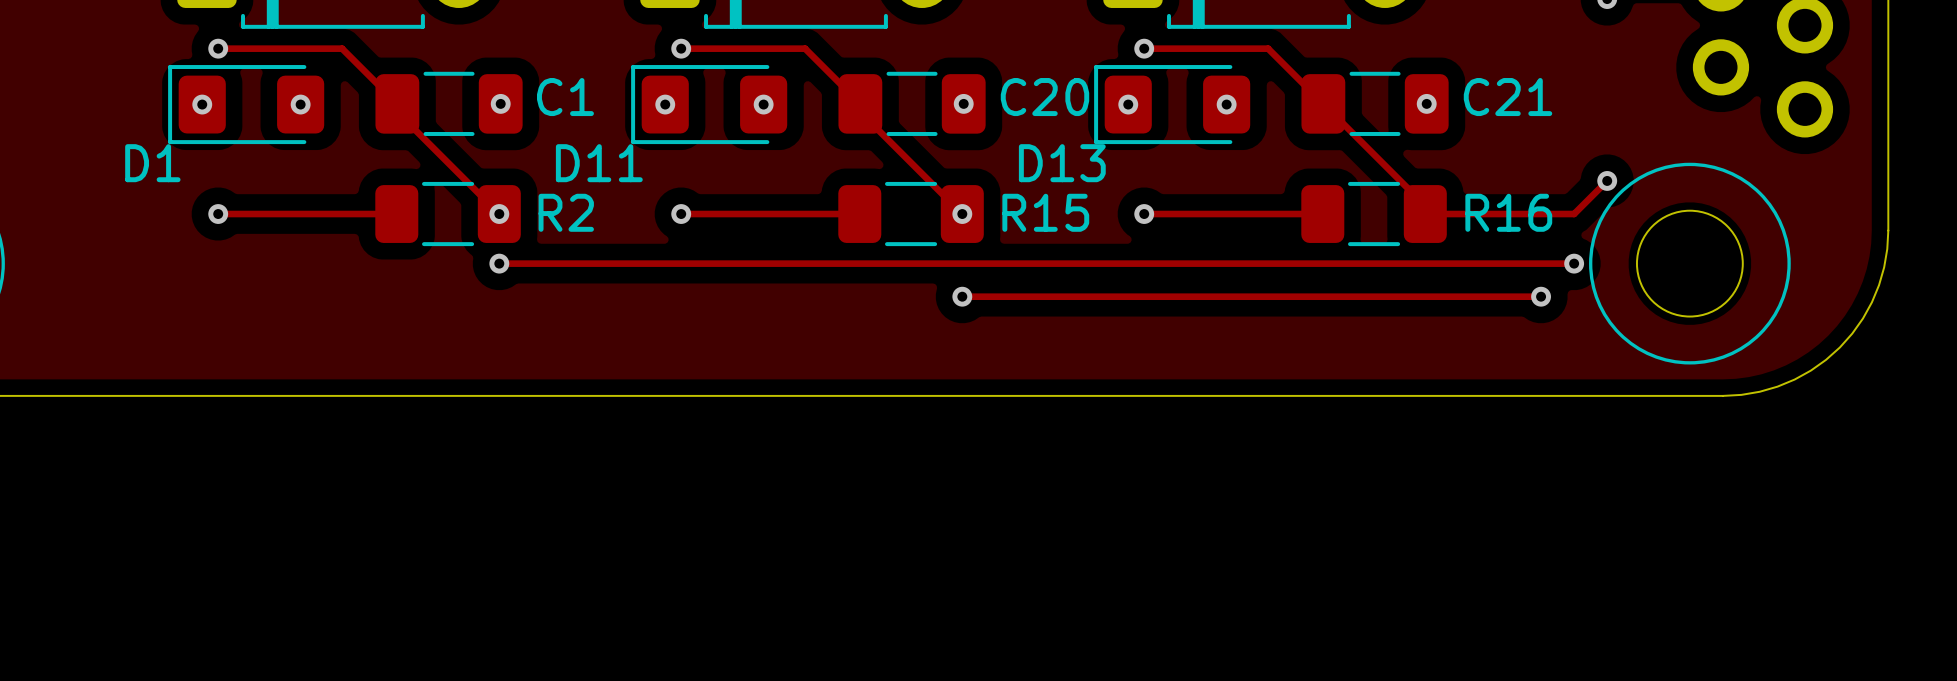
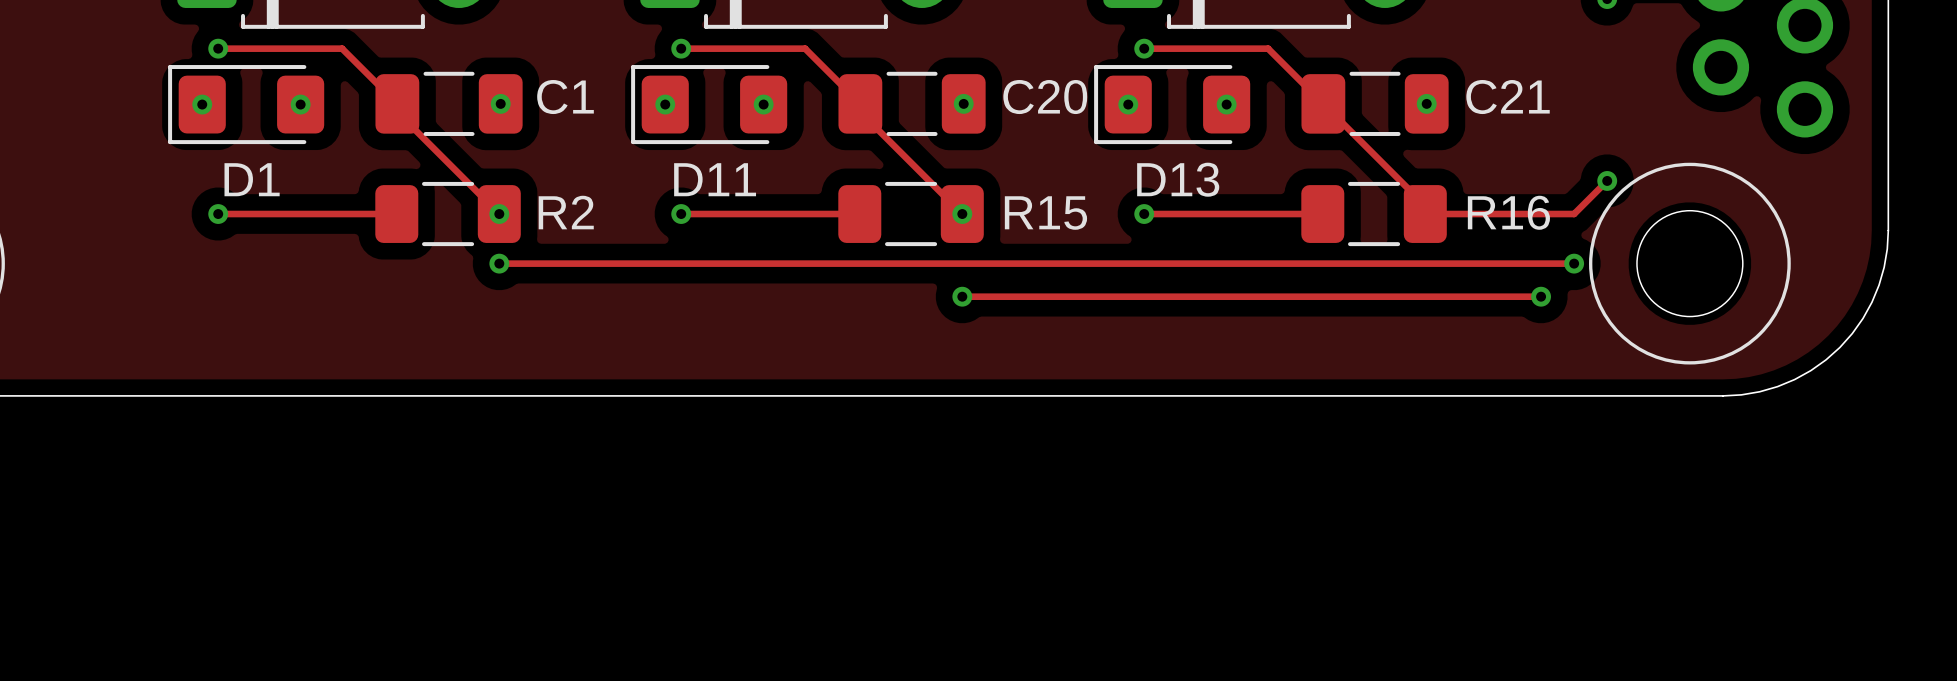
D1 name position: D1 (152, 163) -> D1 (252, 179)
D11 name position: D11 (599, 163) -> D11 (715, 179)
D13 name position: D13 (1062, 163) -> D13 (1178, 179)

